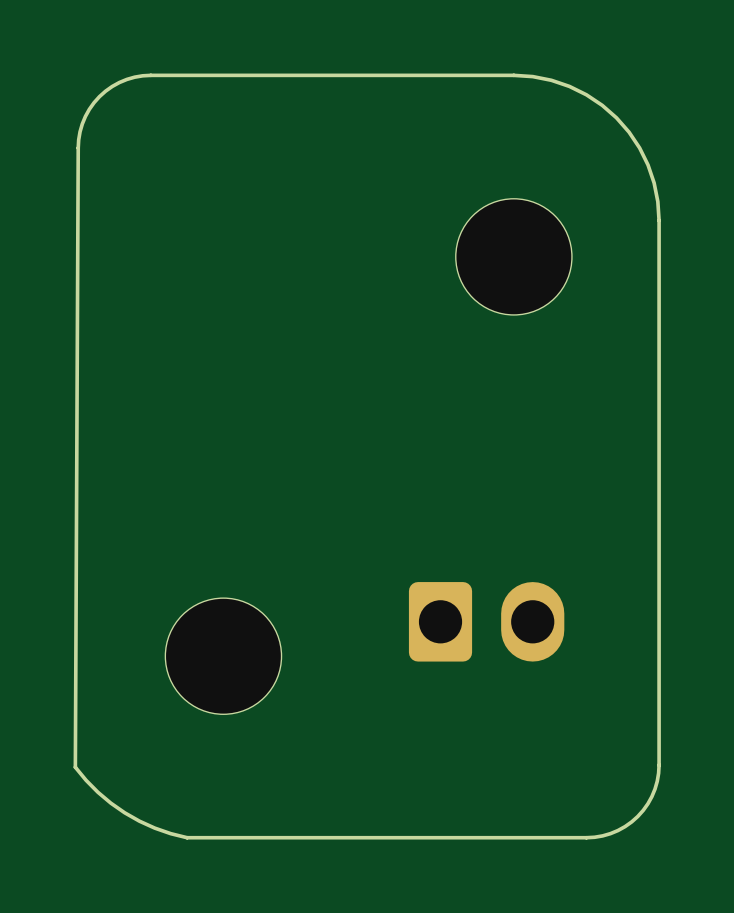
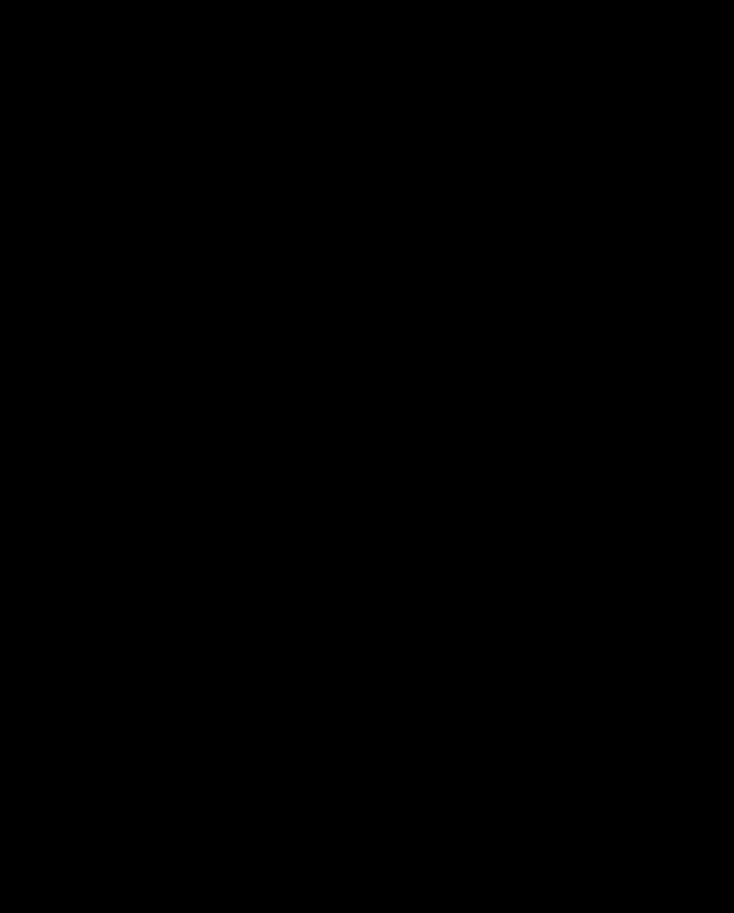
board edge: (513, 75) (142, 75) (119, 82) (105, 91) (94, 102) (85, 116) (80, 131) (78, 147) (75, 767) (97, 792) (124, 812) (139, 821) (170, 833) (187, 837) (586, 837) (602, 835) (625, 826) (637, 816) (651, 796) (657, 781) (659, 765) (657, 201) (648, 165) (639, 147) (629, 132) (602, 105) (569, 86) (551, 80) (513, 75) -> none
part: (513, 256) -> none
part: (486, 621) -> none
part: (223, 656) -> none

